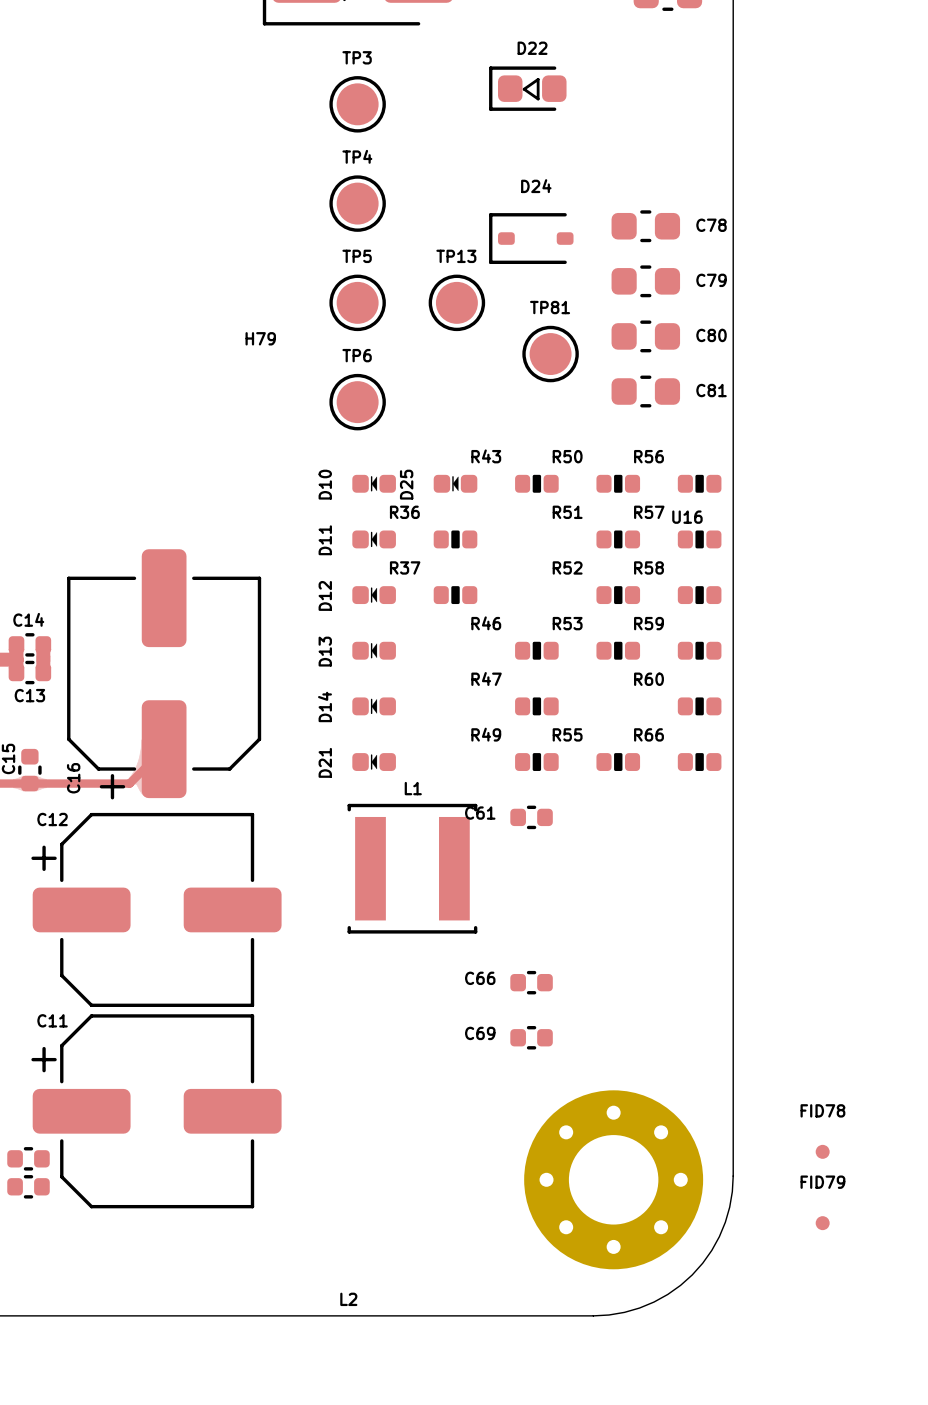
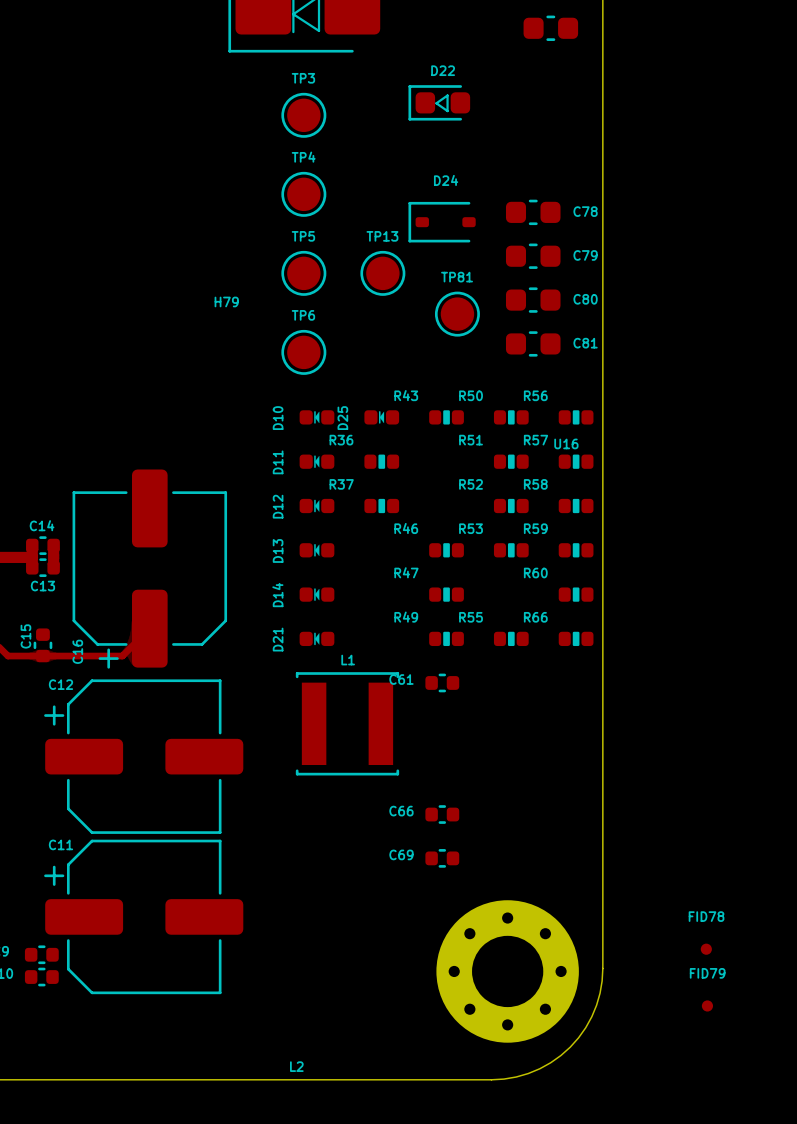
FID78 position: (822, 1151) -> (706, 949)
FID79 position: (822, 1223) -> (707, 1005)

